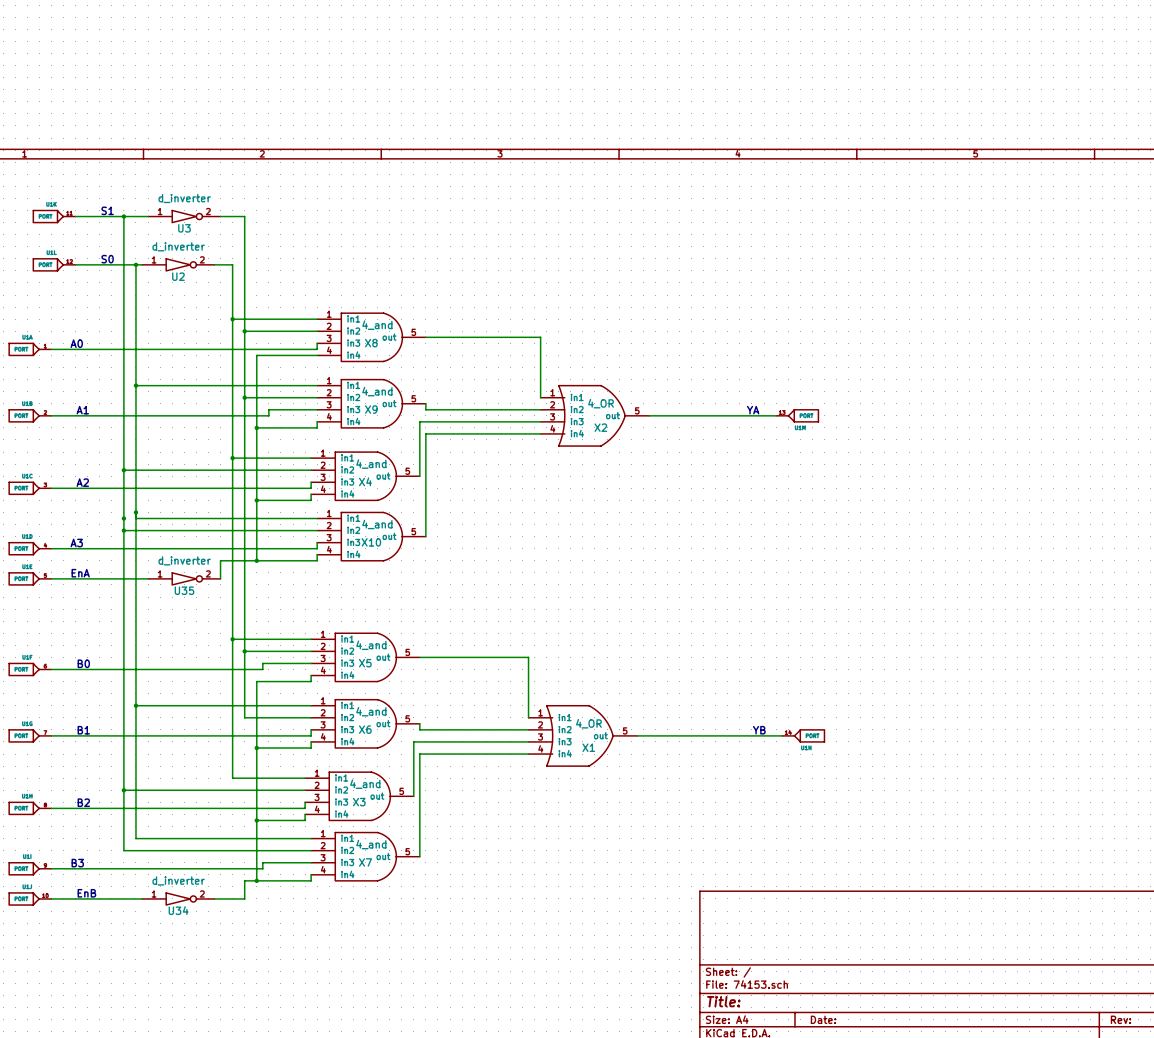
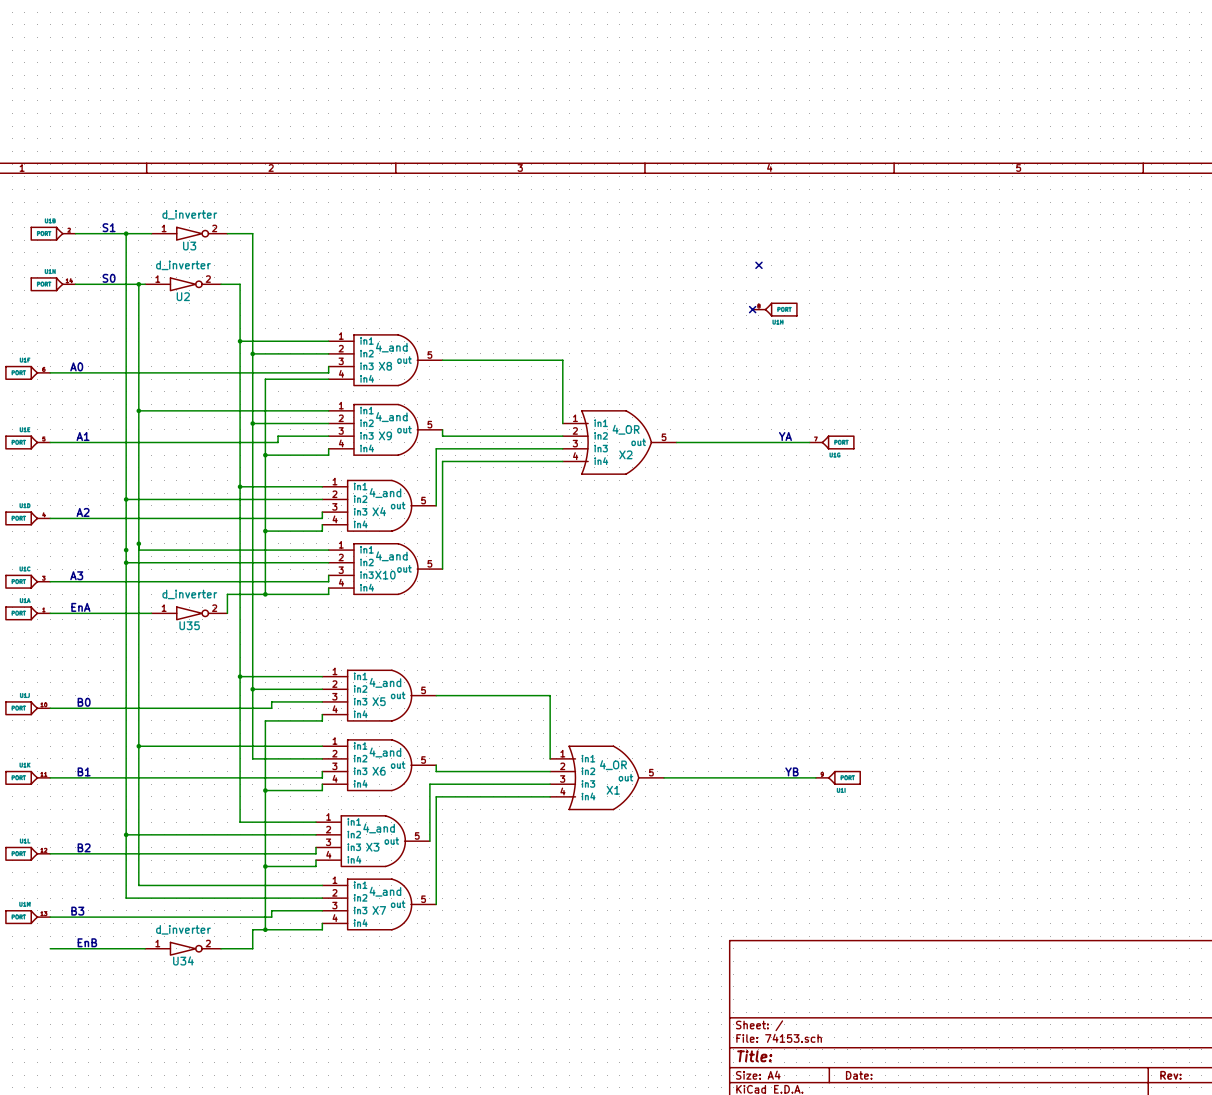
part position: (54, 216) -> (28, 777)
no-connect mark: none -> (758, 265)
part position: (54, 264) -> (28, 853)
no-connect mark: none -> (752, 309)
part position: (30, 349) -> (28, 613)
part position: (30, 415) -> (53, 233)
part position: (797, 415) -> (28, 917)
part rotation: 0° (803, 415) -> 180° (21, 917)
part position: (30, 488) -> (28, 581)
part position: (30, 548) -> (28, 518)
part position: (30, 578) -> (28, 442)
part position: (30, 669) -> (28, 372)
part rotation: 0° (24, 735) -> 180° (838, 442)
part position: (30, 735) -> (831, 442)
part position: (803, 735) -> (53, 284)
part rotation: 0° (809, 735) -> 180° (47, 284)
part rotation: 0° (24, 808) -> 180° (781, 309)
part position: (30, 808) -> (774, 309)
part rotation: 0° (24, 868) -> 180° (844, 777)
part position: (30, 868) -> (838, 777)
part position: (30, 898) -> (28, 708)

